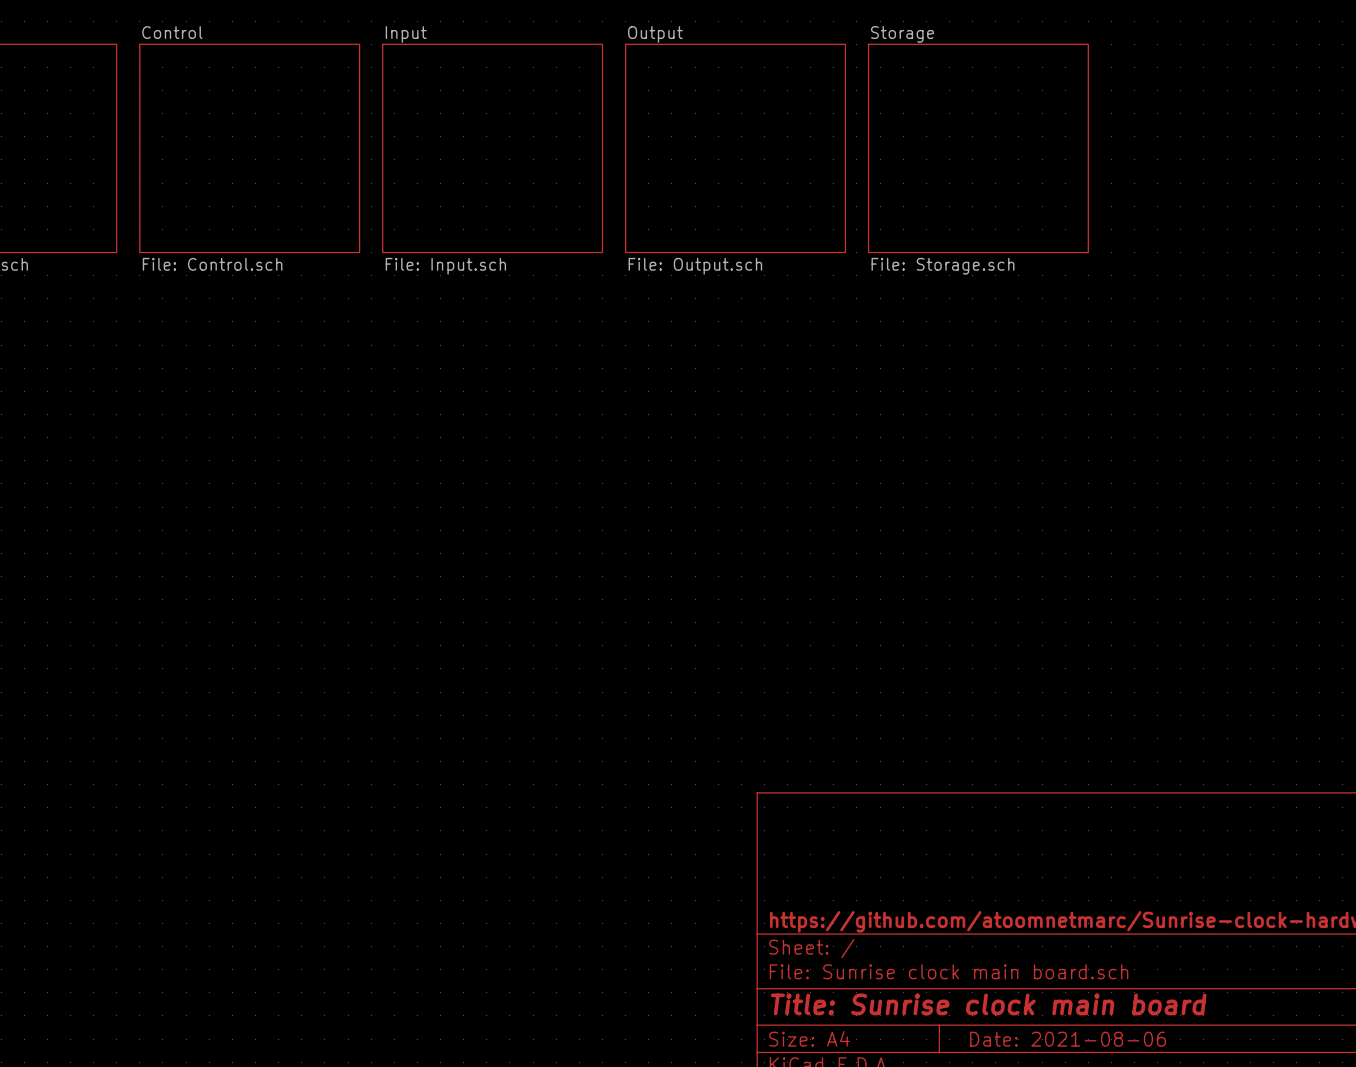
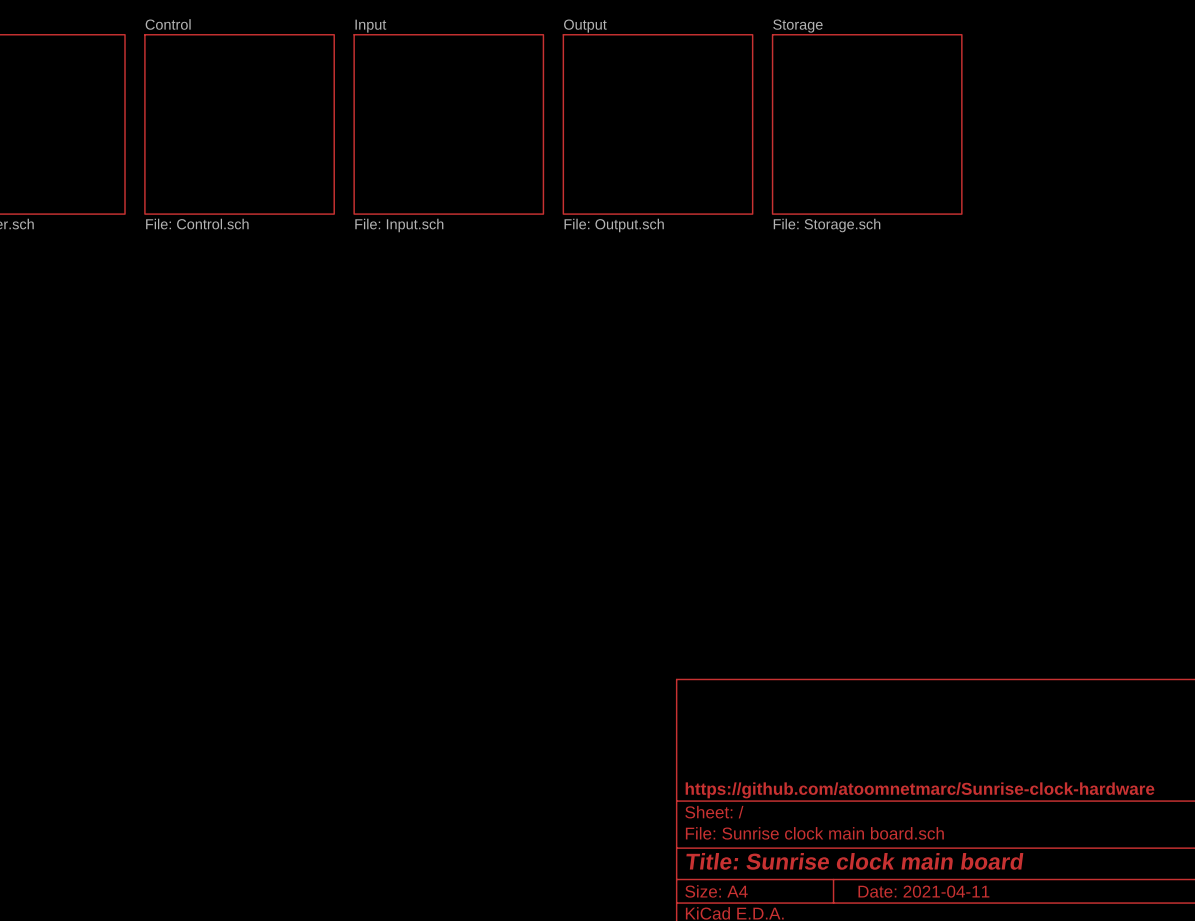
title block: Date: 2021-08-06 (1068, 1039) -> Date: 2021-04-11 (923, 891)

